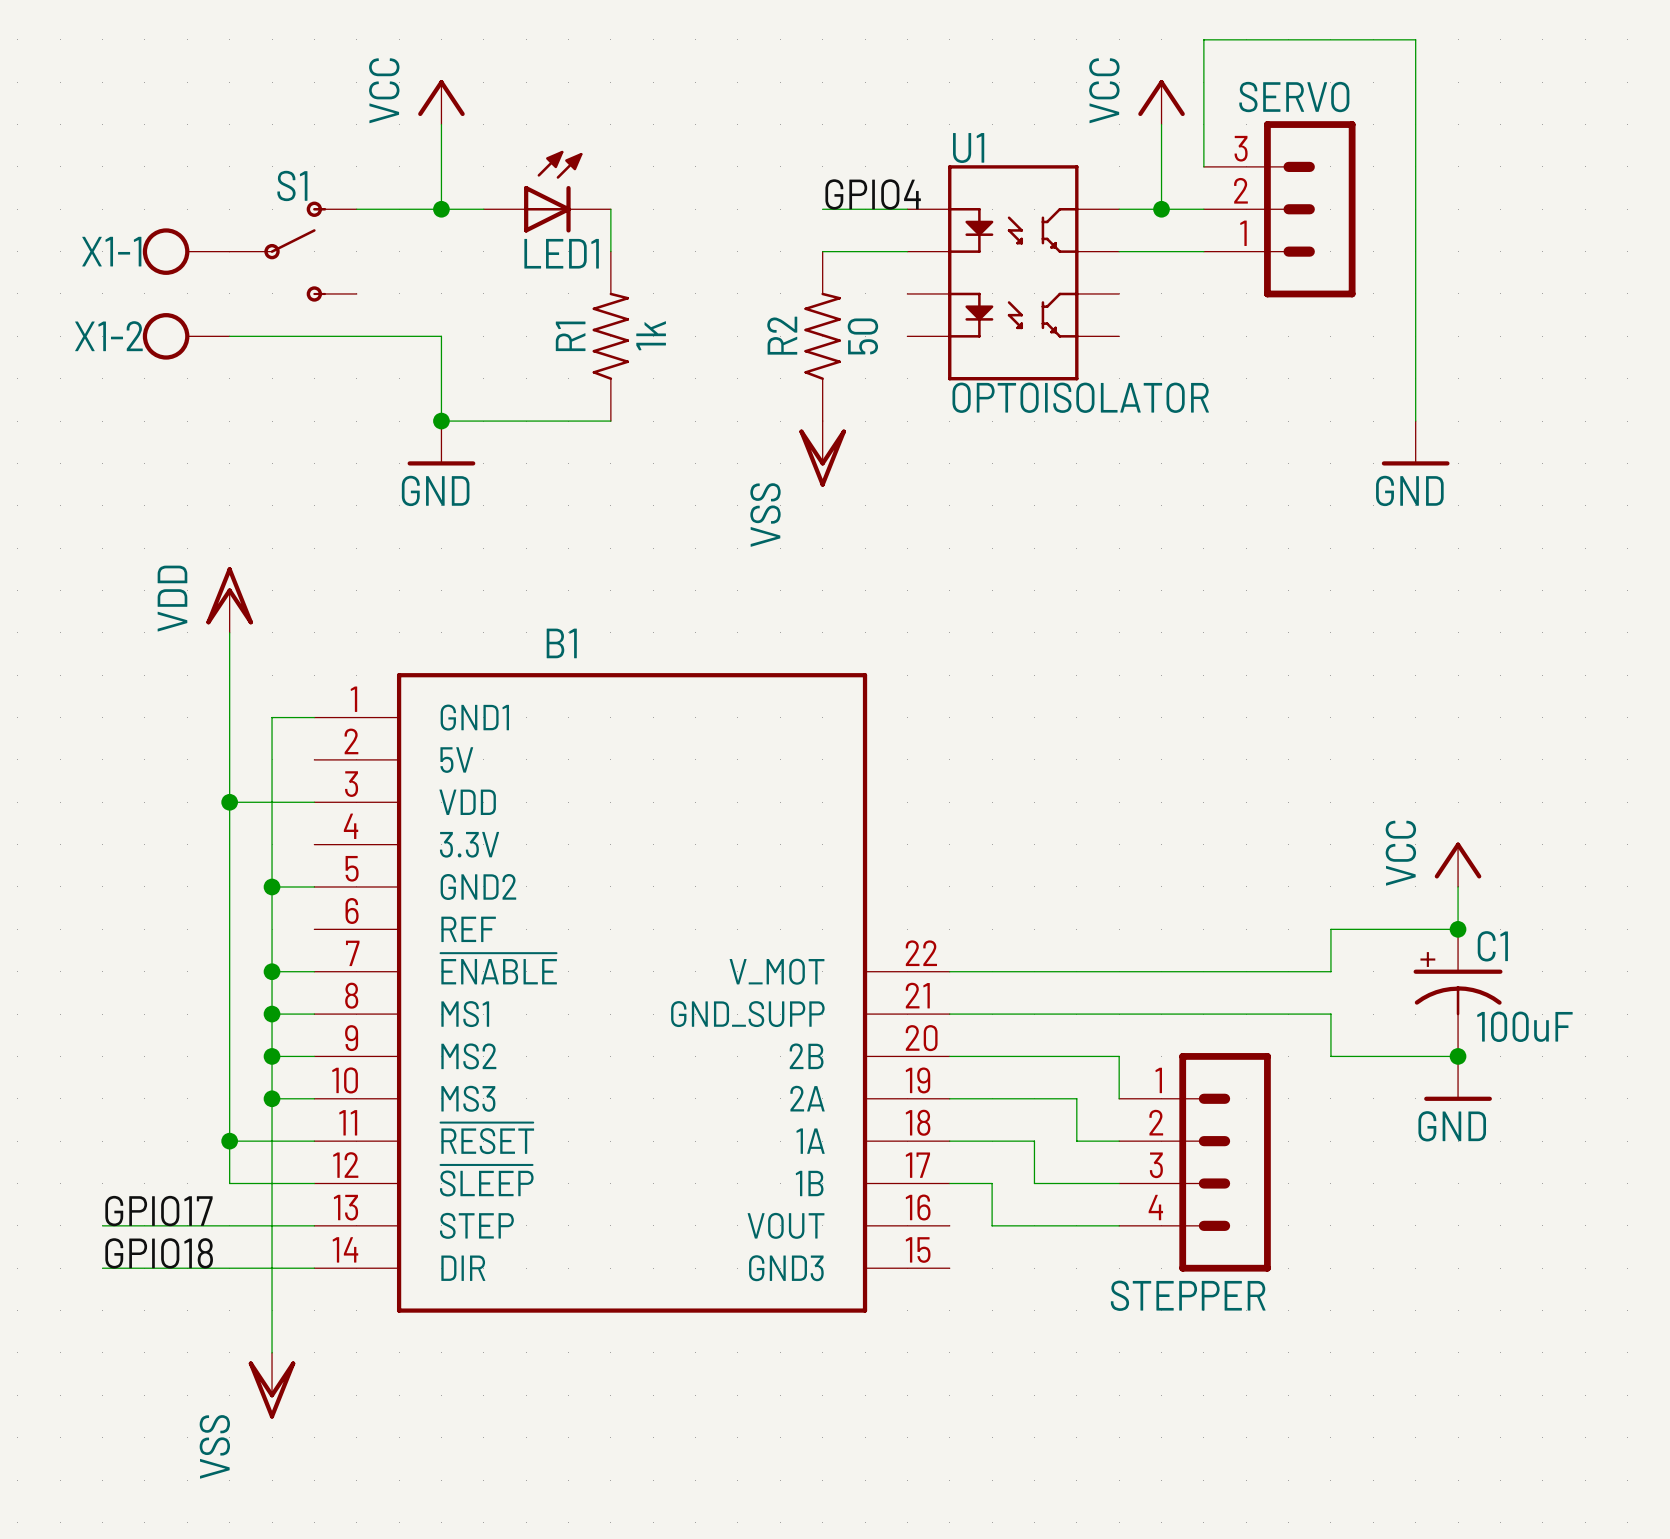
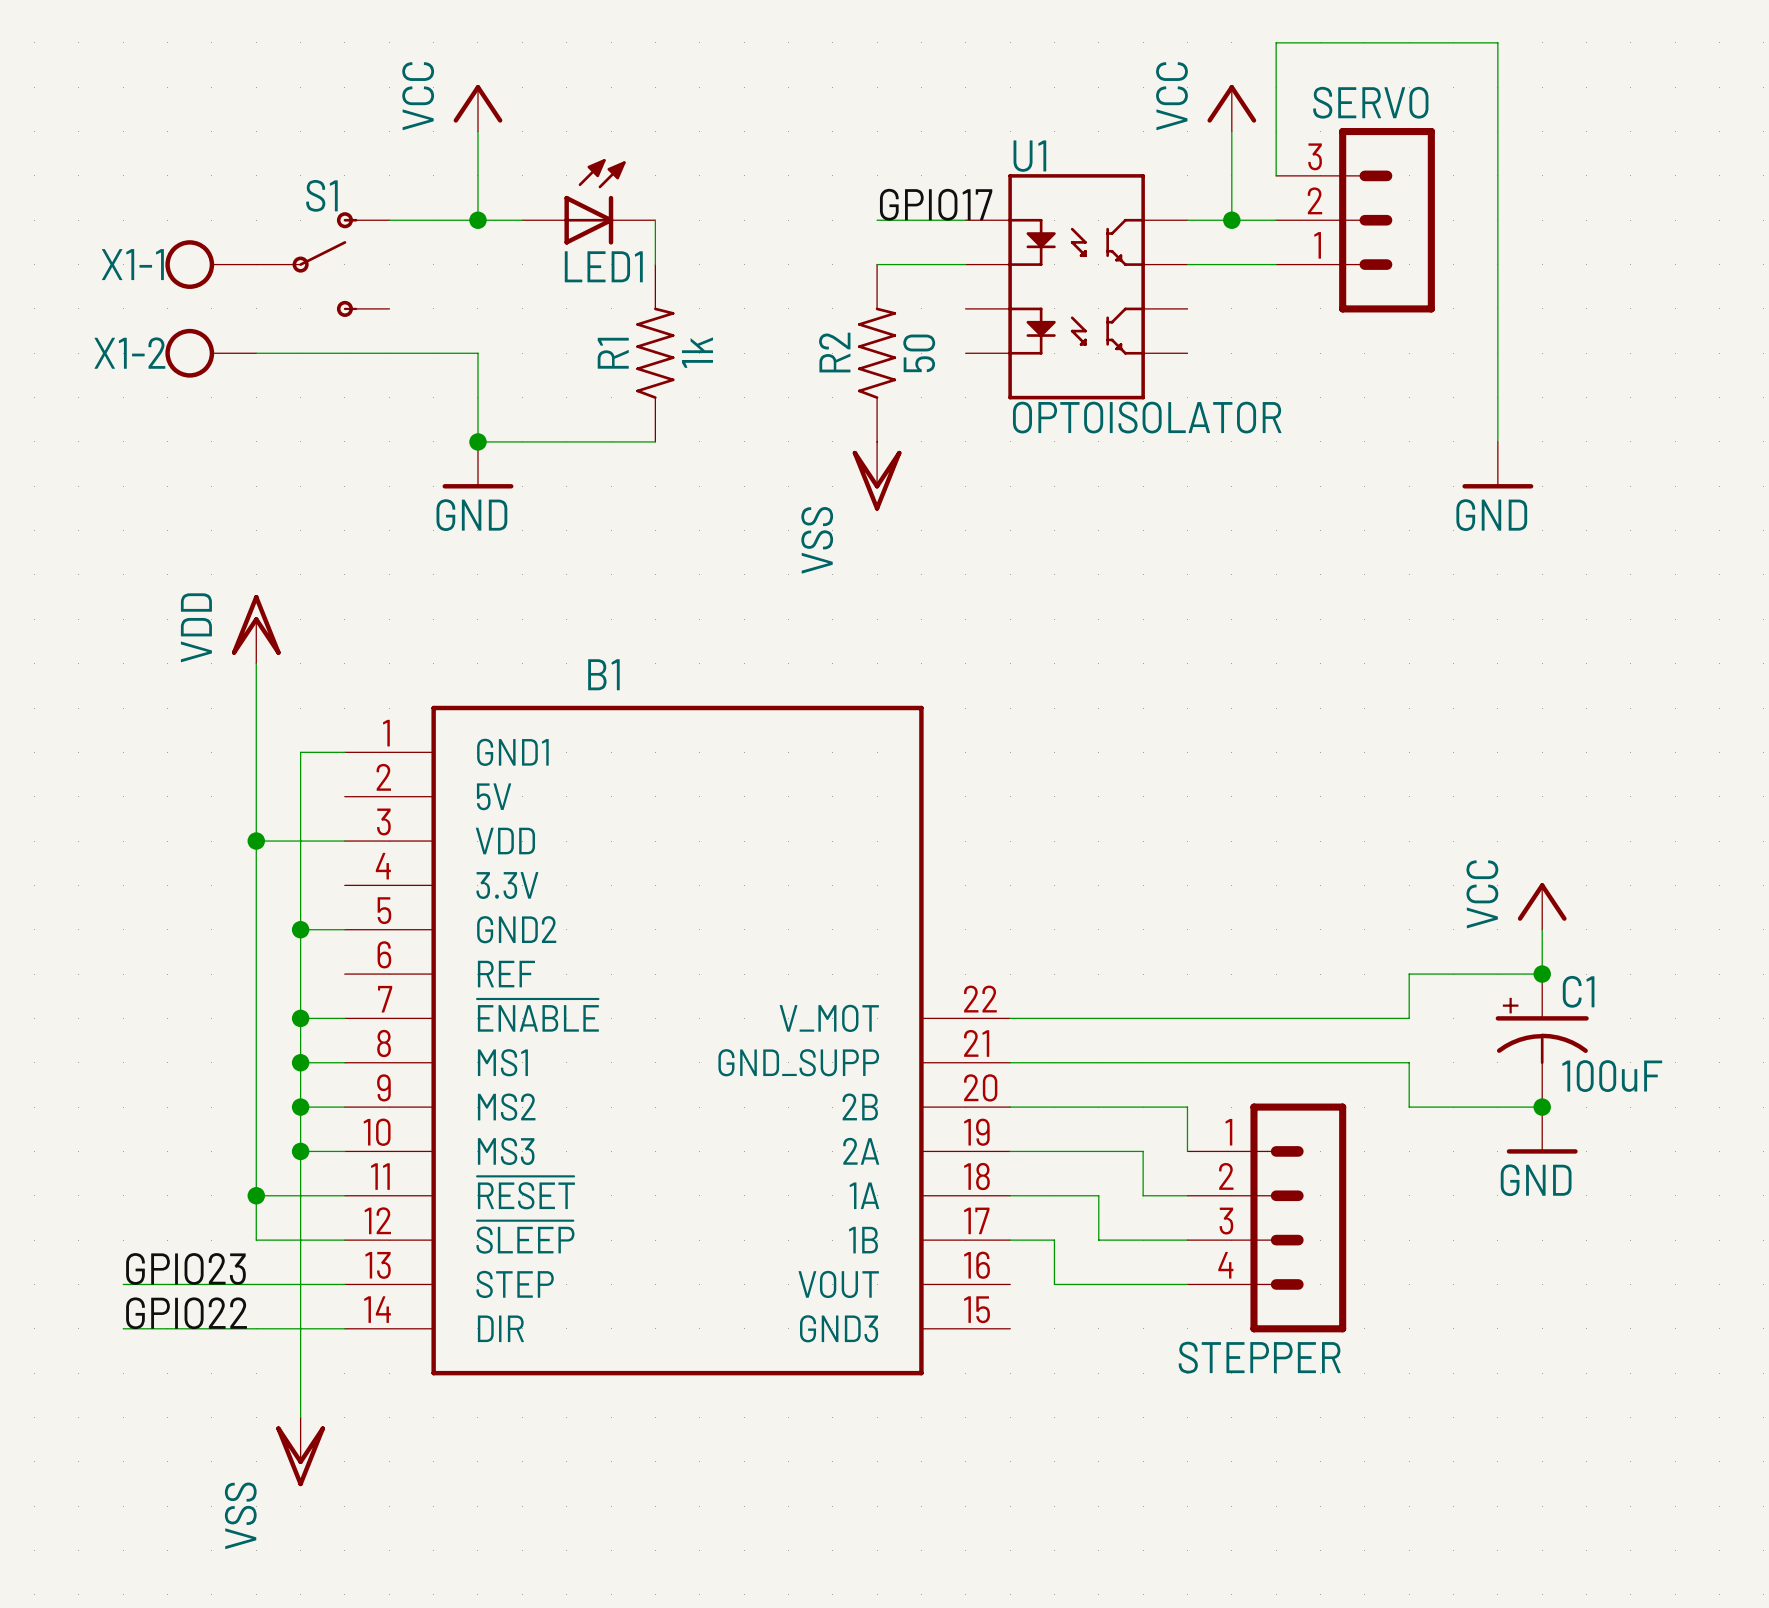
label: GPIO4 (873, 194) -> GPIO17 (936, 204)
label: GPIO17 (158, 1211) -> GPIO23 (185, 1268)
label: GPIO18 (159, 1253) -> GPIO22 (186, 1313)

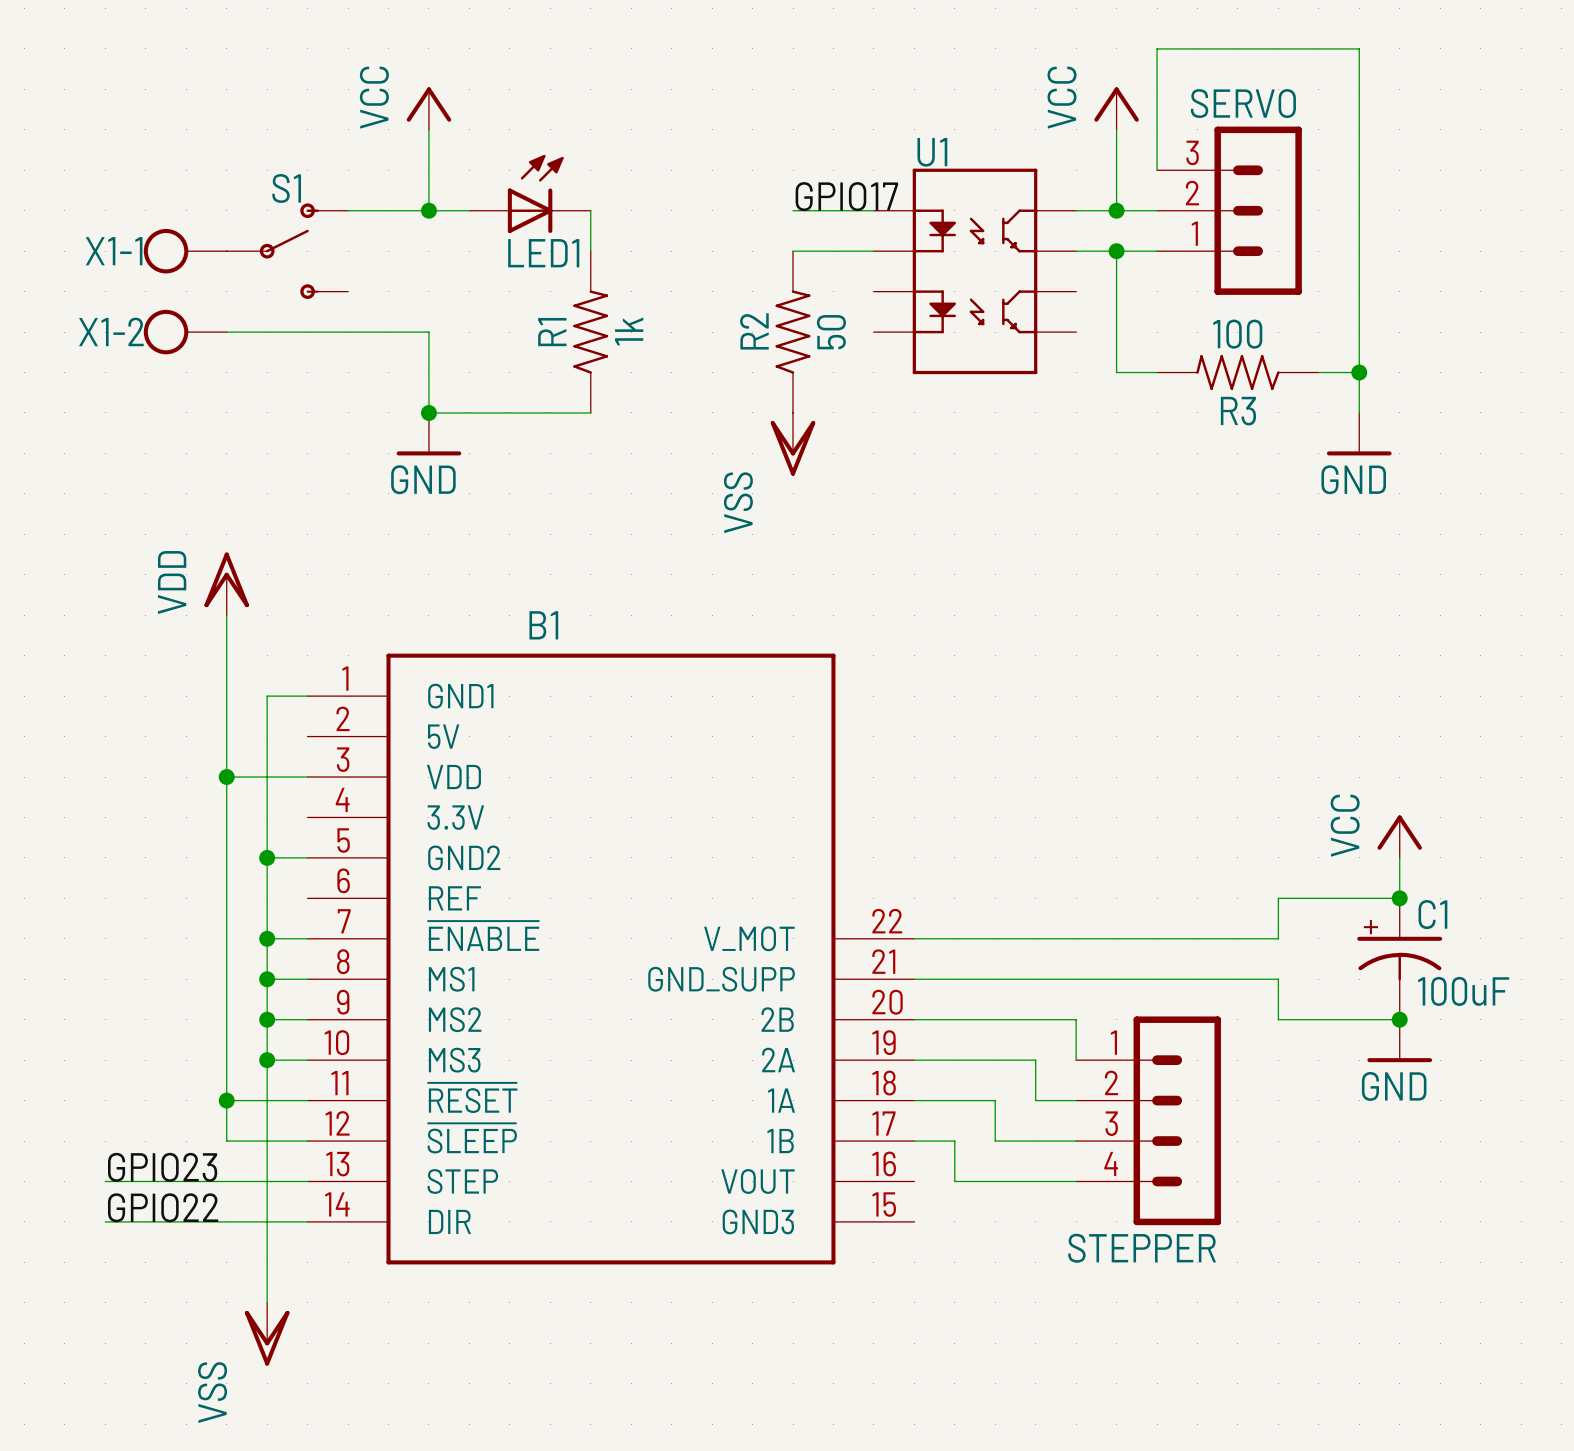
wire: none -> (1116, 251) (1116, 372) (1157, 372)
junction: none -> (1116, 251)
R3: none -> 100 (1237, 372)
wire: none -> (1318, 372) (1359, 372)
junction: none -> (1359, 372)
U1 value: OPTOISOLATOR (1147, 417) -> none

